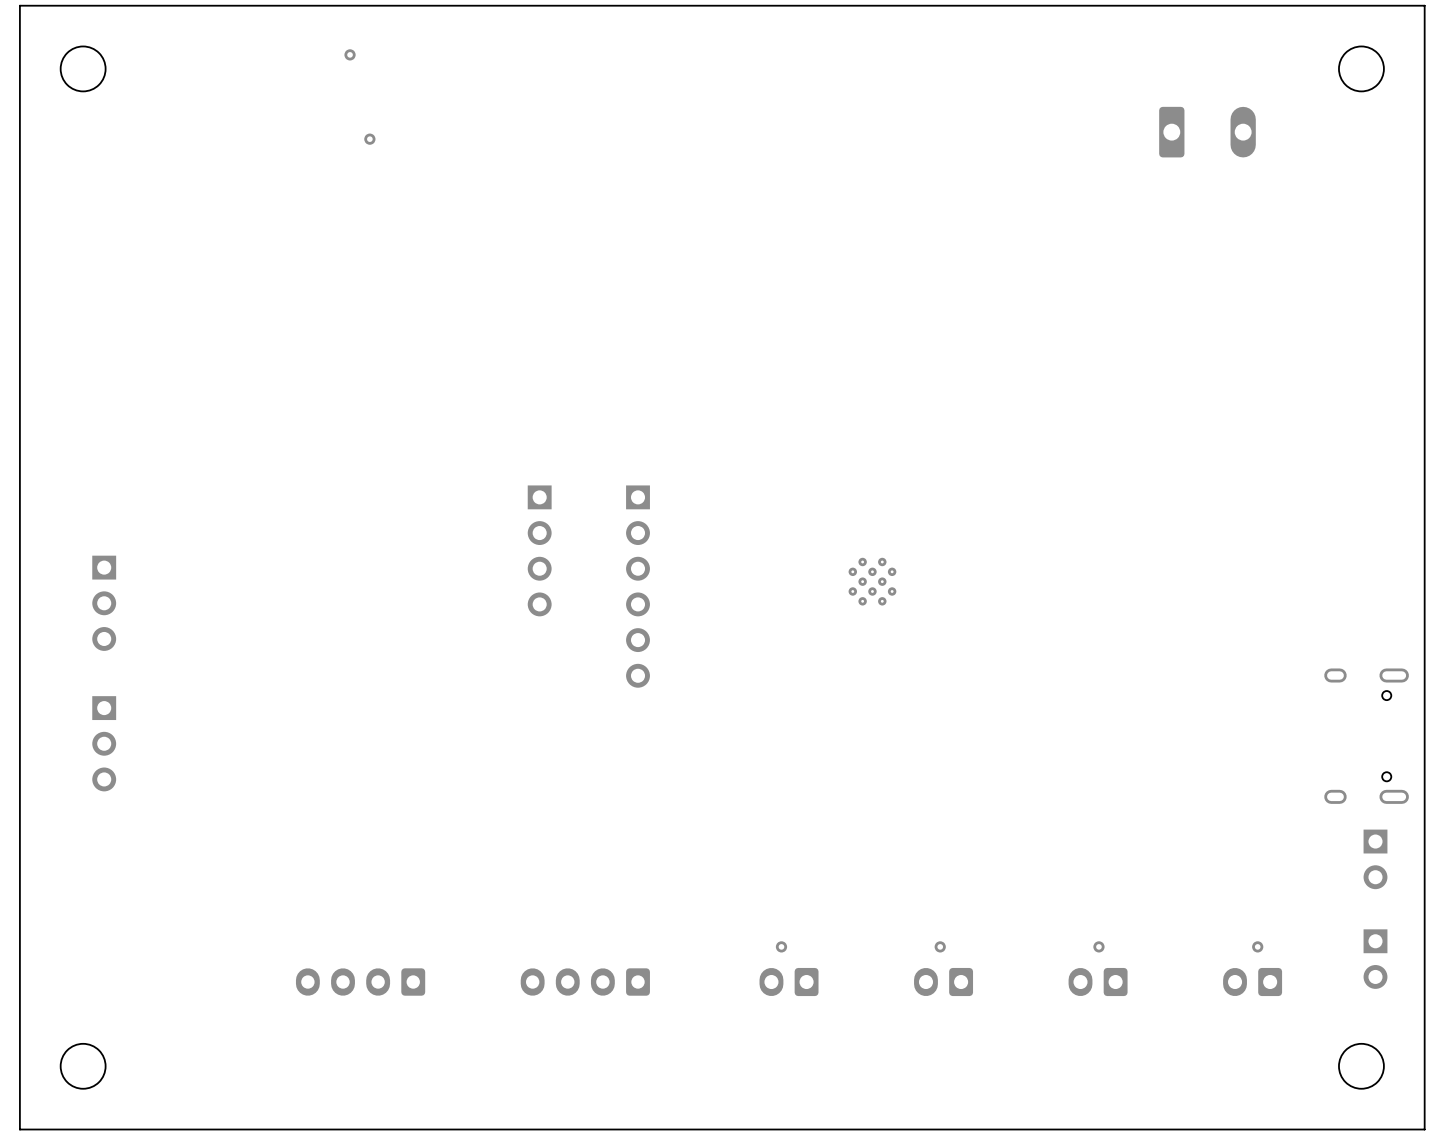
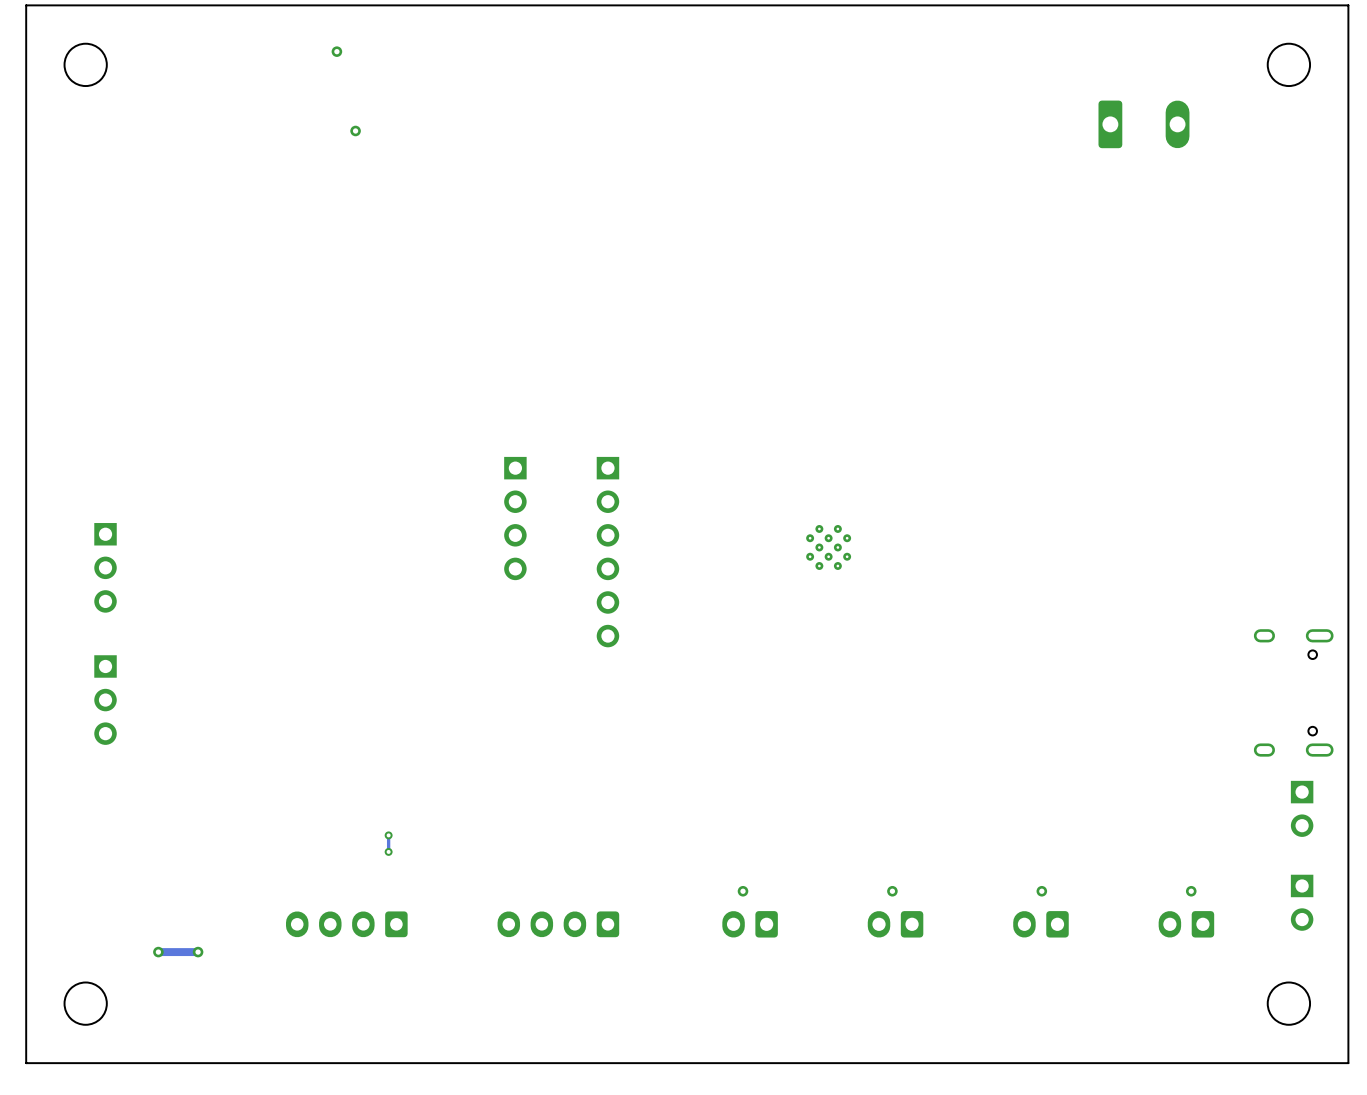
track: none -> (388, 835) (388, 851)
via: none -> (388, 835)
via: none -> (388, 851)
via: none -> (158, 952)
track: none -> (198, 952) (158, 952)
via: none -> (198, 952)

